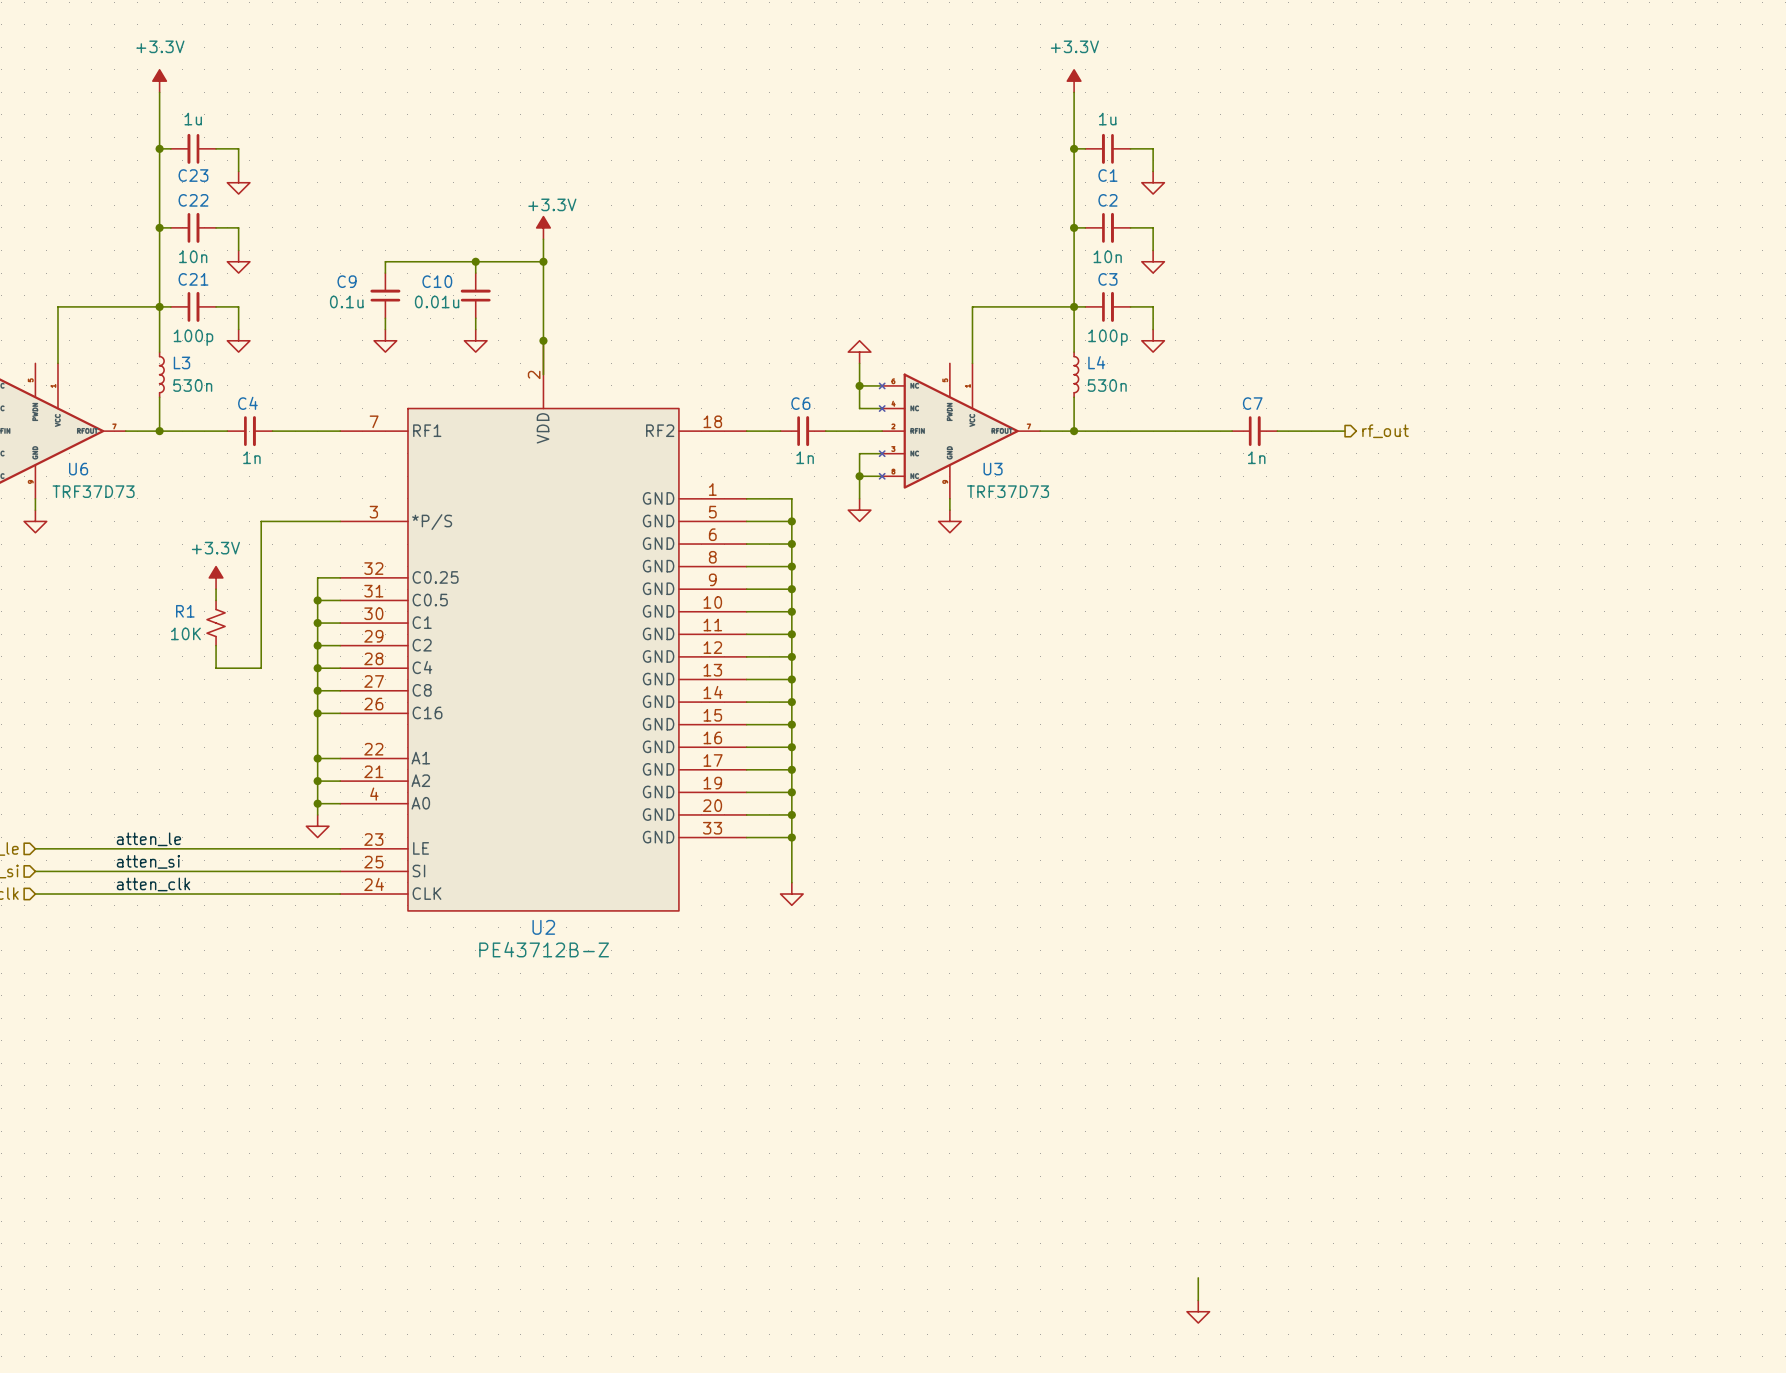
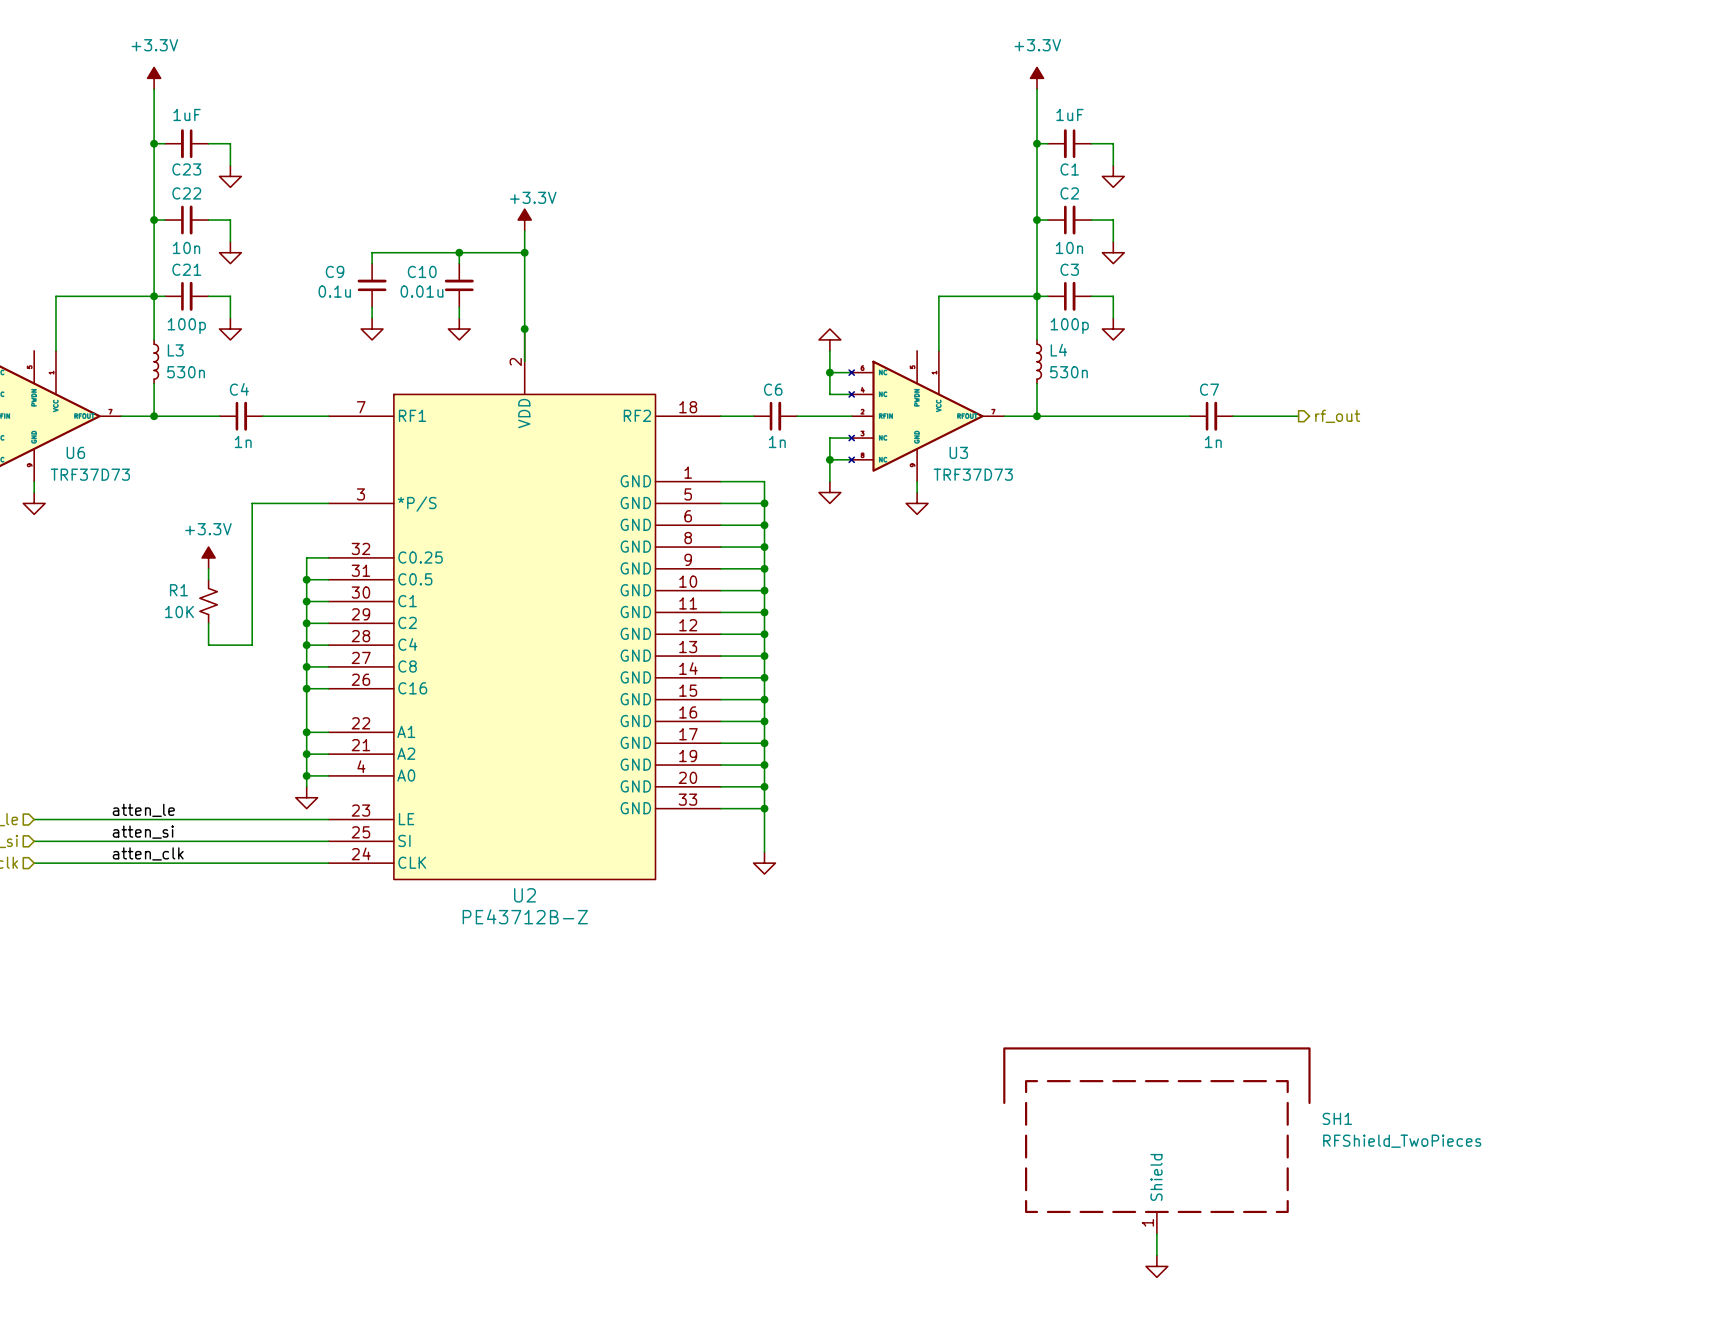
C23 value: 1u (193, 119) -> 1uF (187, 114)
C1 value: 1u (1107, 119) -> 1uF (1069, 114)
SH1: none -> RFShield_TwoPieces (1156, 1140)

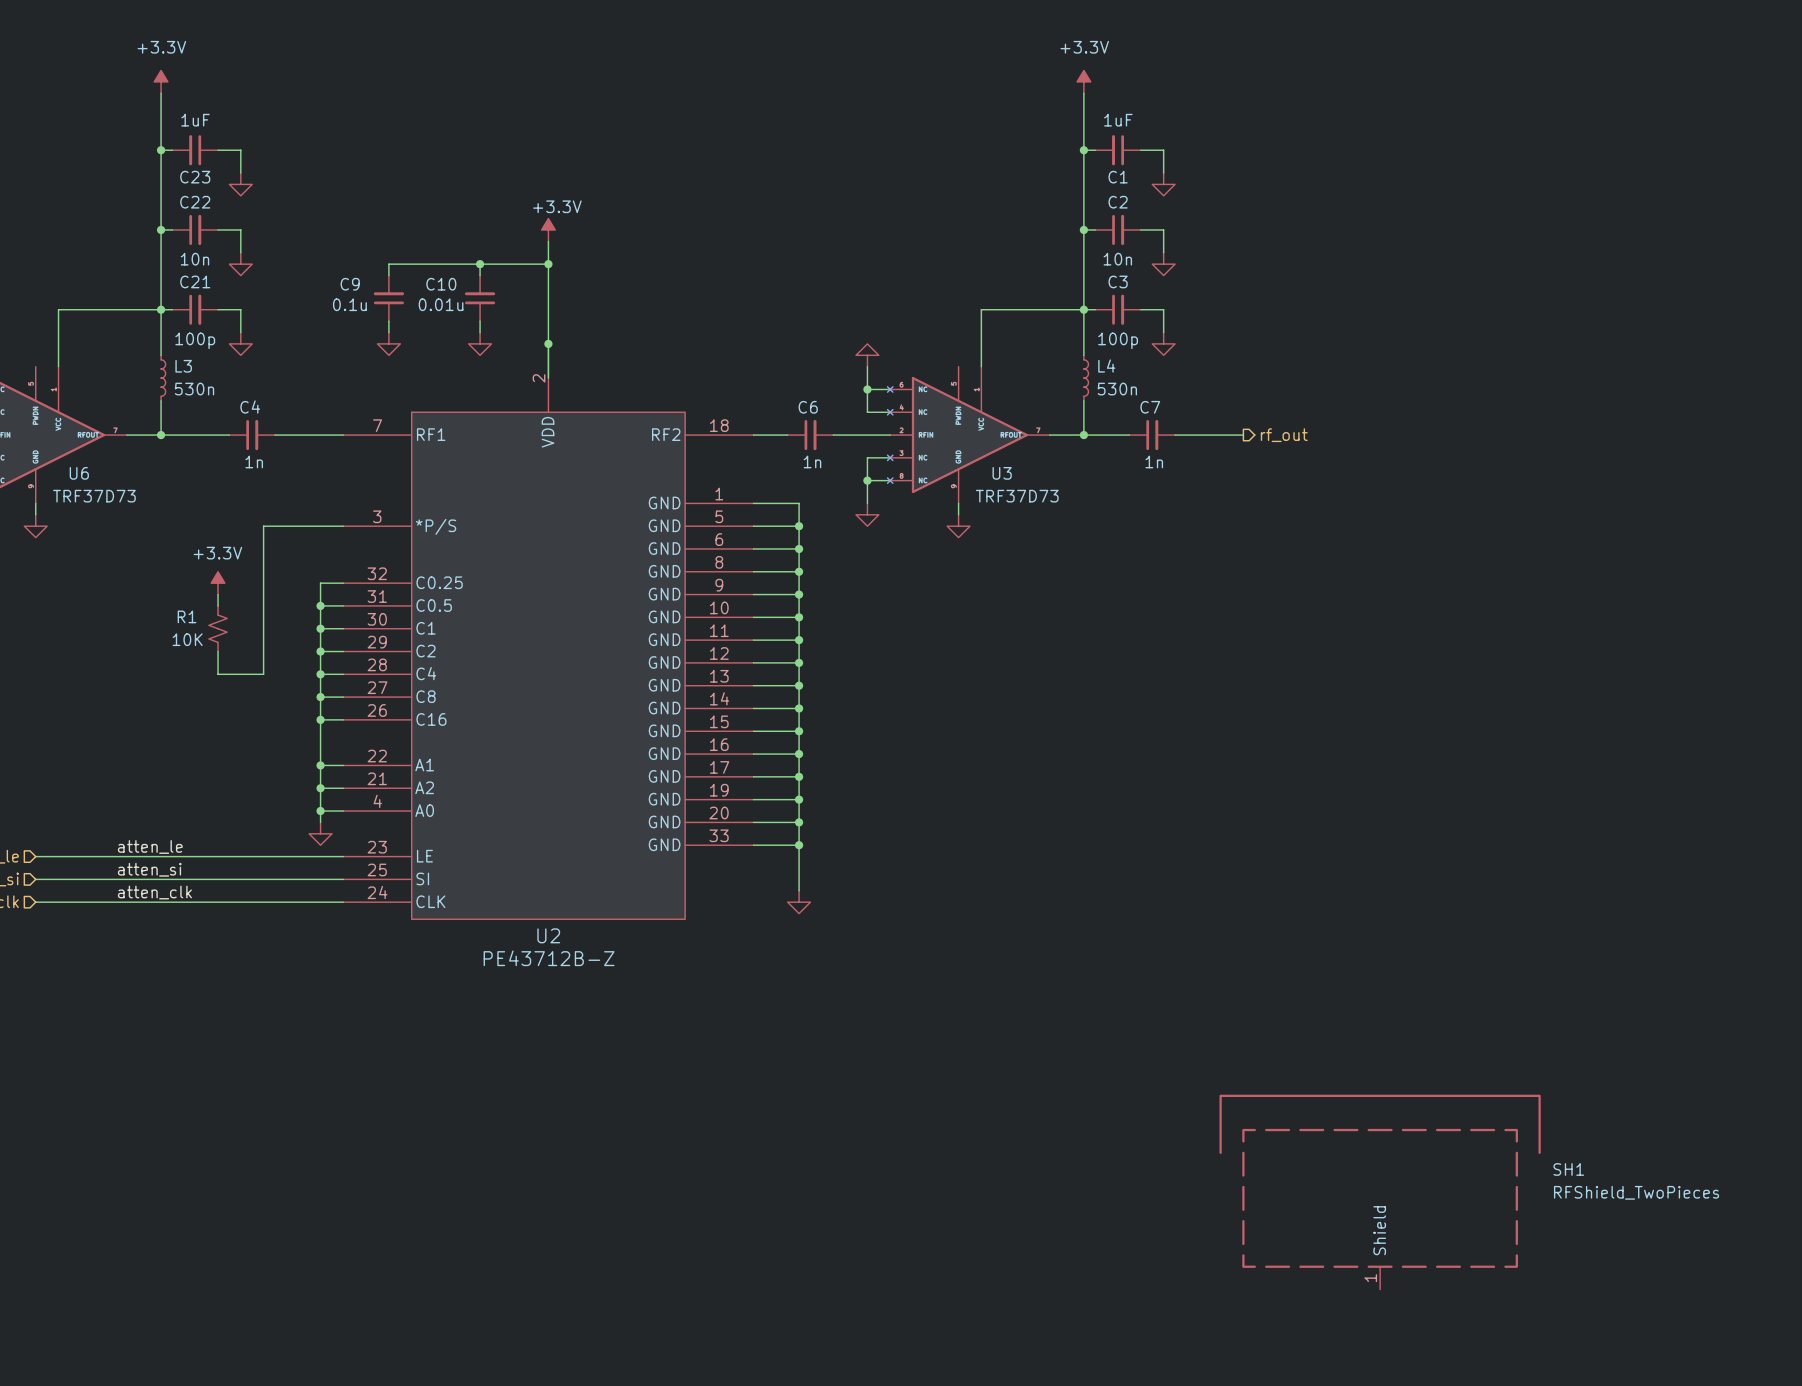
C7 position: (1211, 416) -> (1152, 435)
wire: (1233, 416) (1298, 416) -> none
hierarchical label position: rf_out (1337, 416) -> rf_out (1284, 435)
SH1 position: (1156, 1140) -> (1380, 1192)
wire: (1156, 1233) (1156, 1255) -> none
power symbol: (1156, 1266) -> none

